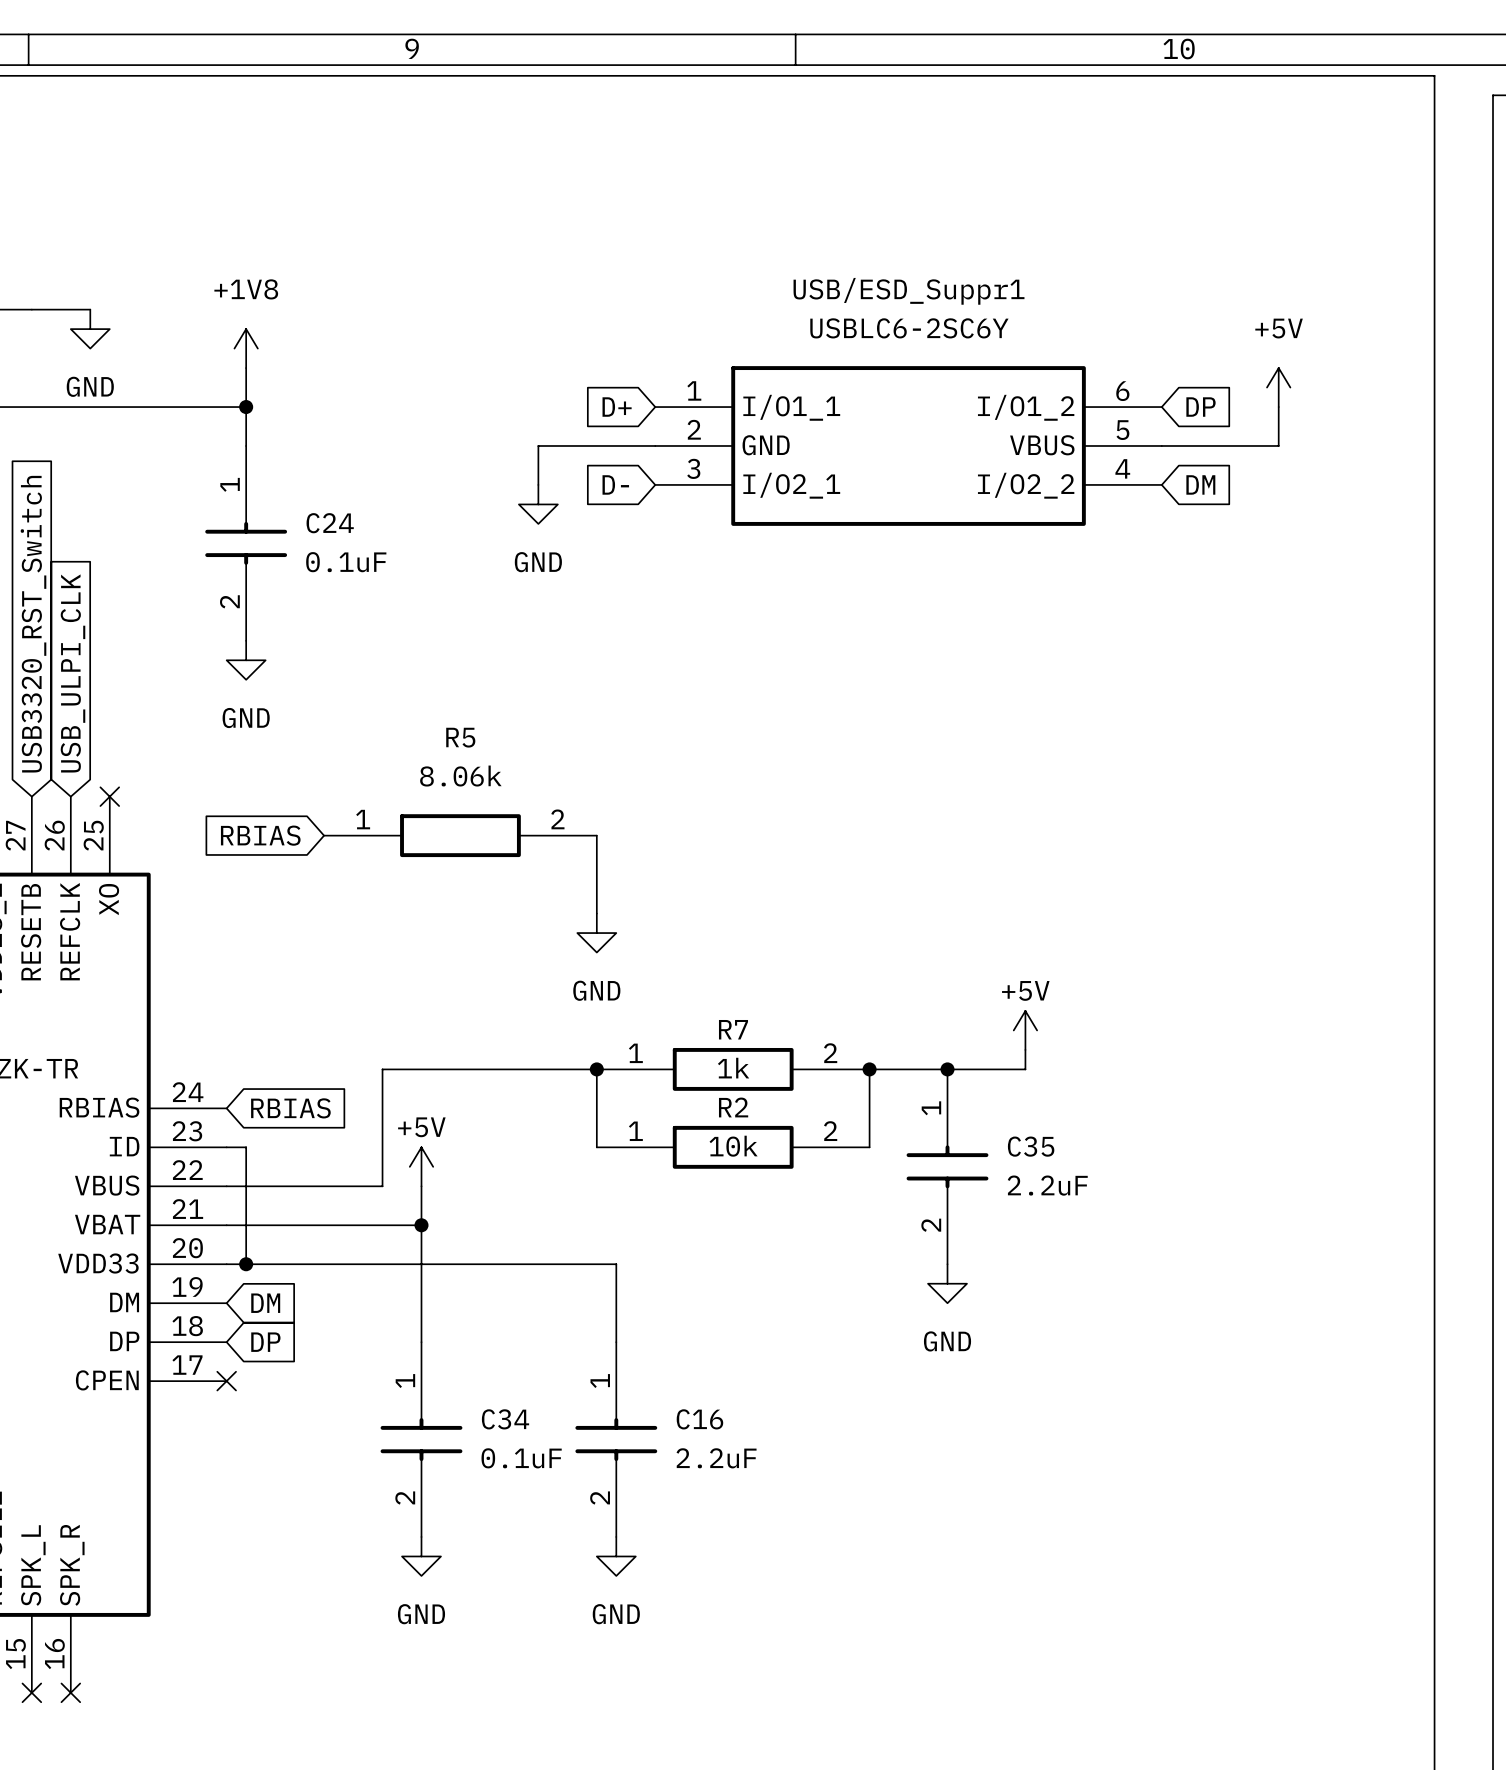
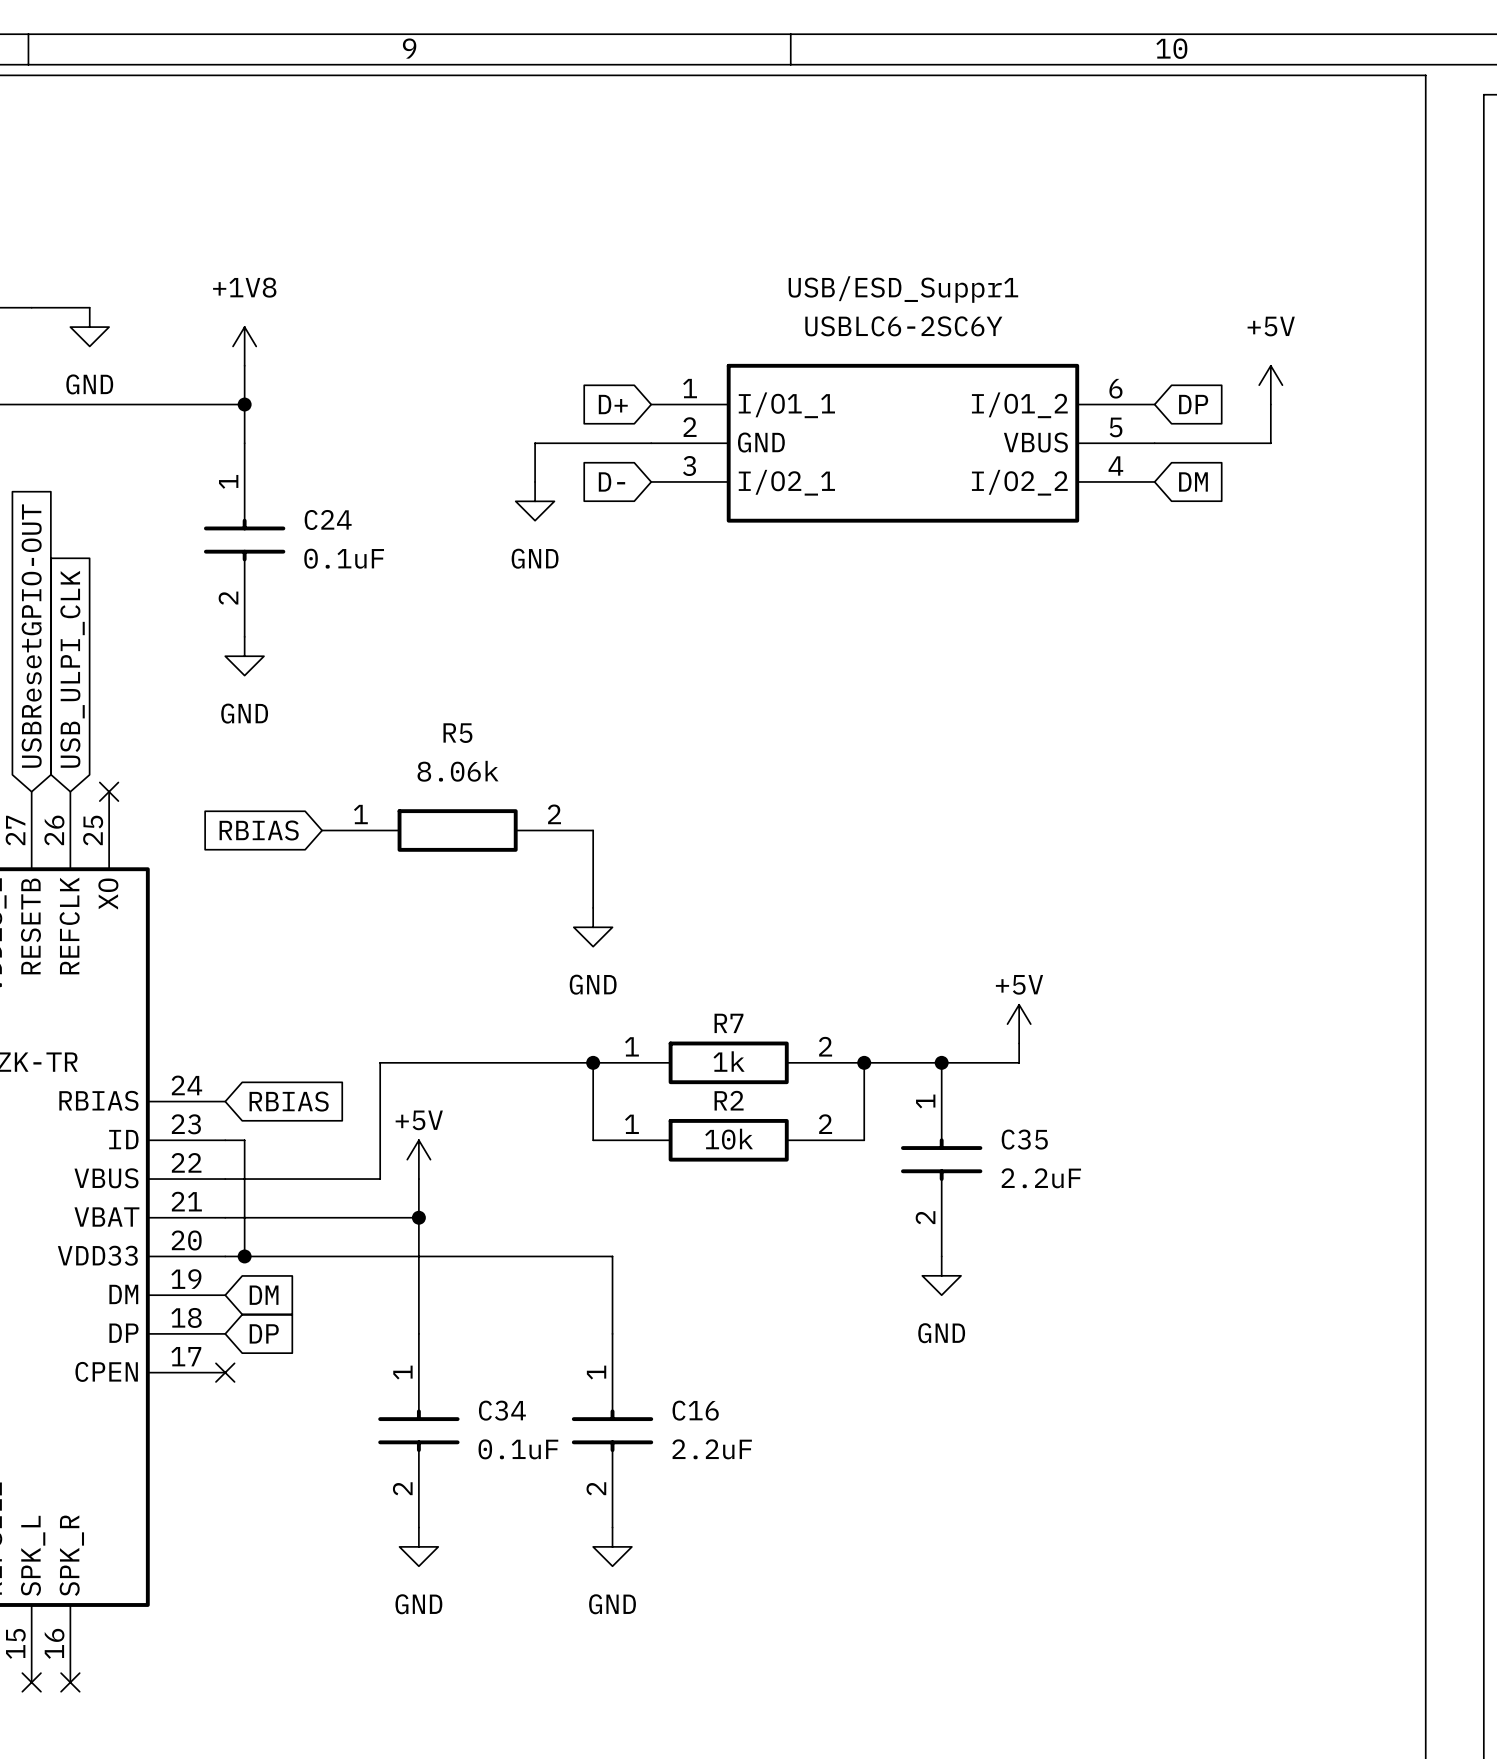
global label: USB3320_RST_Switch (33, 624) -> USBResetGPIO-OUT (31, 636)

